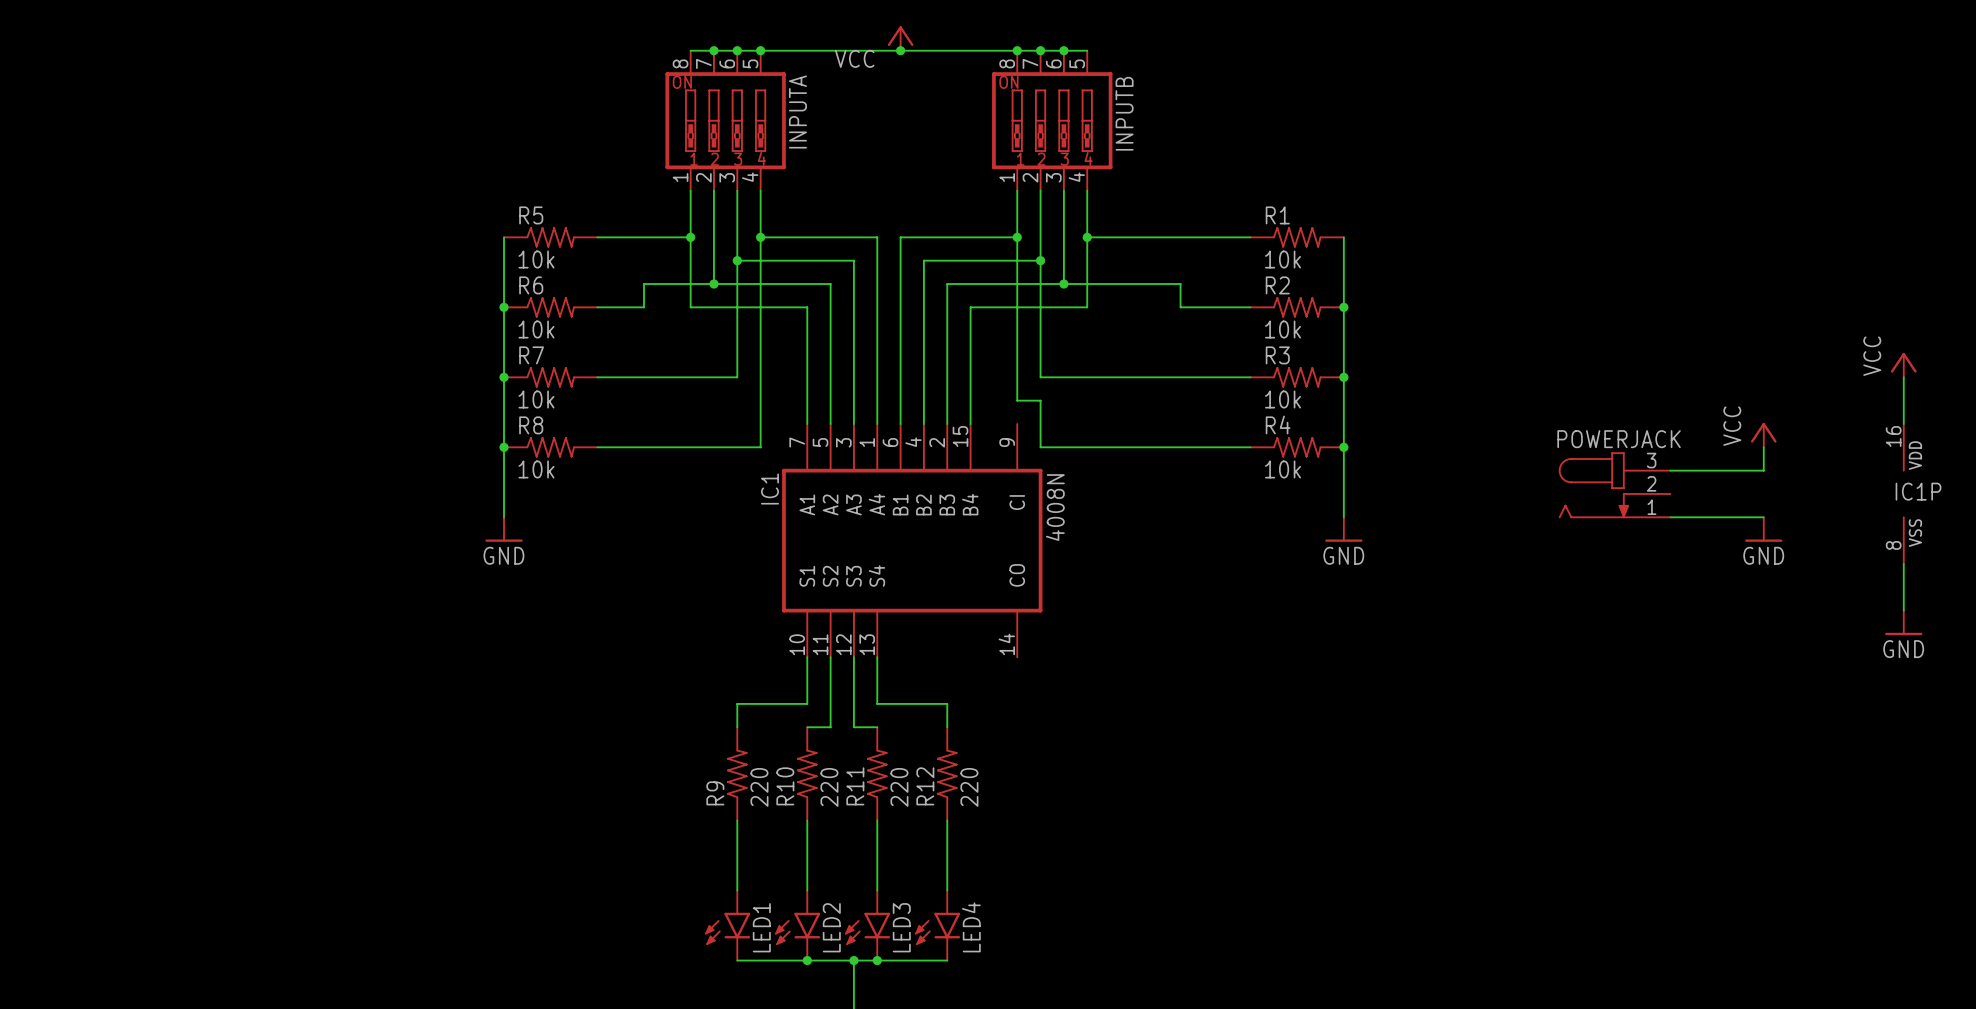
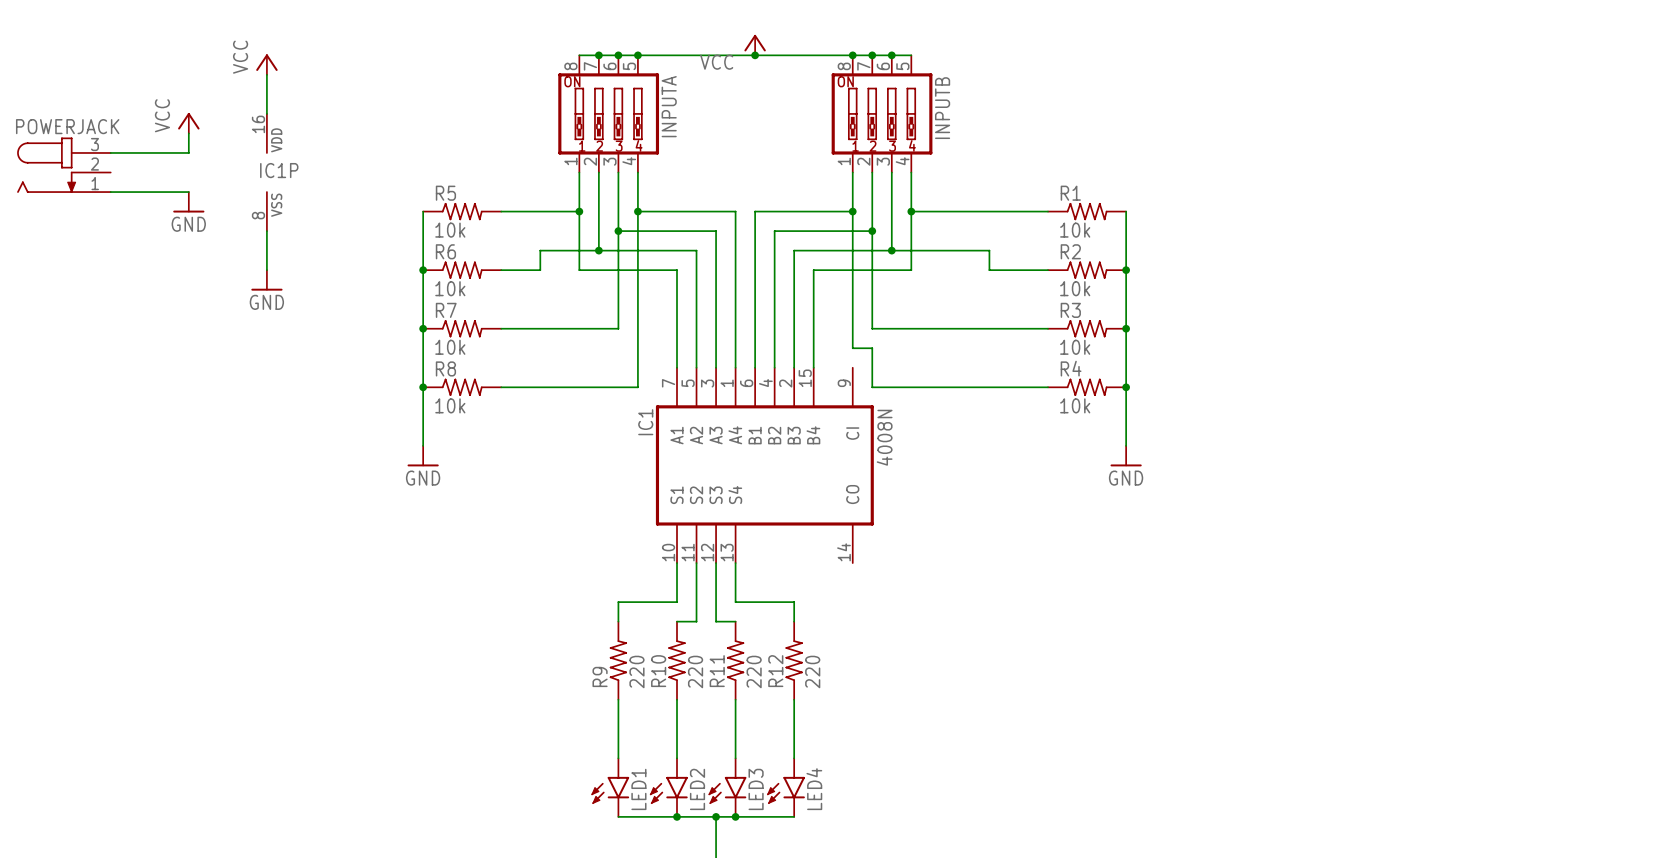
power symbol: none -> VCC (266, 64)
wire: none -> (266, 74) (266, 113)
power symbol: none -> VCC (188, 123)
wire: none -> (188, 133) (188, 152) (110, 152)
POWERJACK: none -> (64, 165)
wire: none -> (110, 192) (188, 192)
power symbol: none -> GND (188, 202)
wire: none -> (266, 231) (266, 270)
power symbol: none -> GND (266, 280)
power symbol: VCC (1903, 365) -> none
wire: (1903, 377) (1903, 423) -> none
power symbol: VCC (1763, 435) -> none
wire: (1763, 447) (1763, 470) (1670, 470) -> none
POWERJACK: (1614, 485) -> none
IC1P position: (1903, 493) -> (266, 172)
wire: (1670, 517) (1763, 517) -> none
power symbol: GND (1763, 529) -> none
wire: (1903, 563) (1903, 610) -> none
power symbol: GND (1903, 622) -> none

